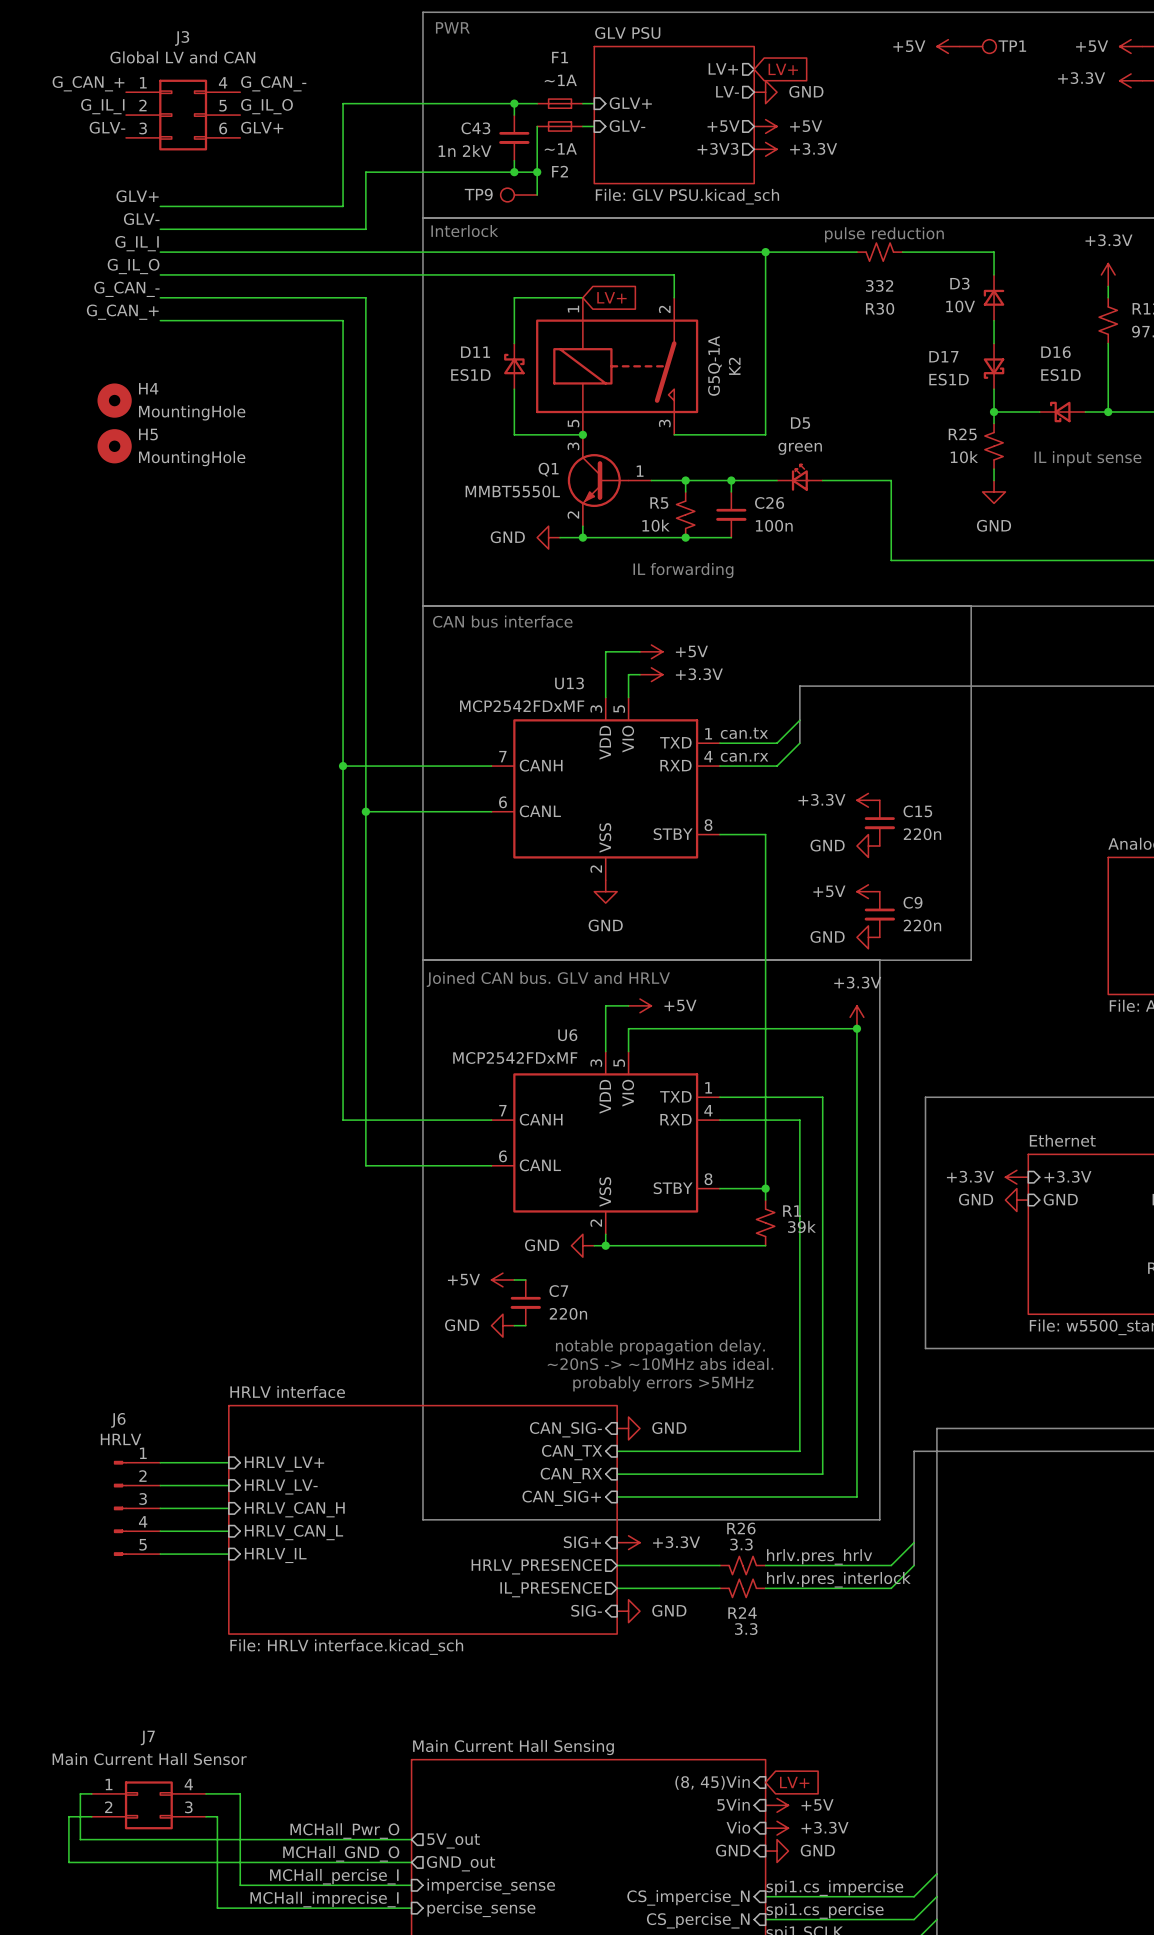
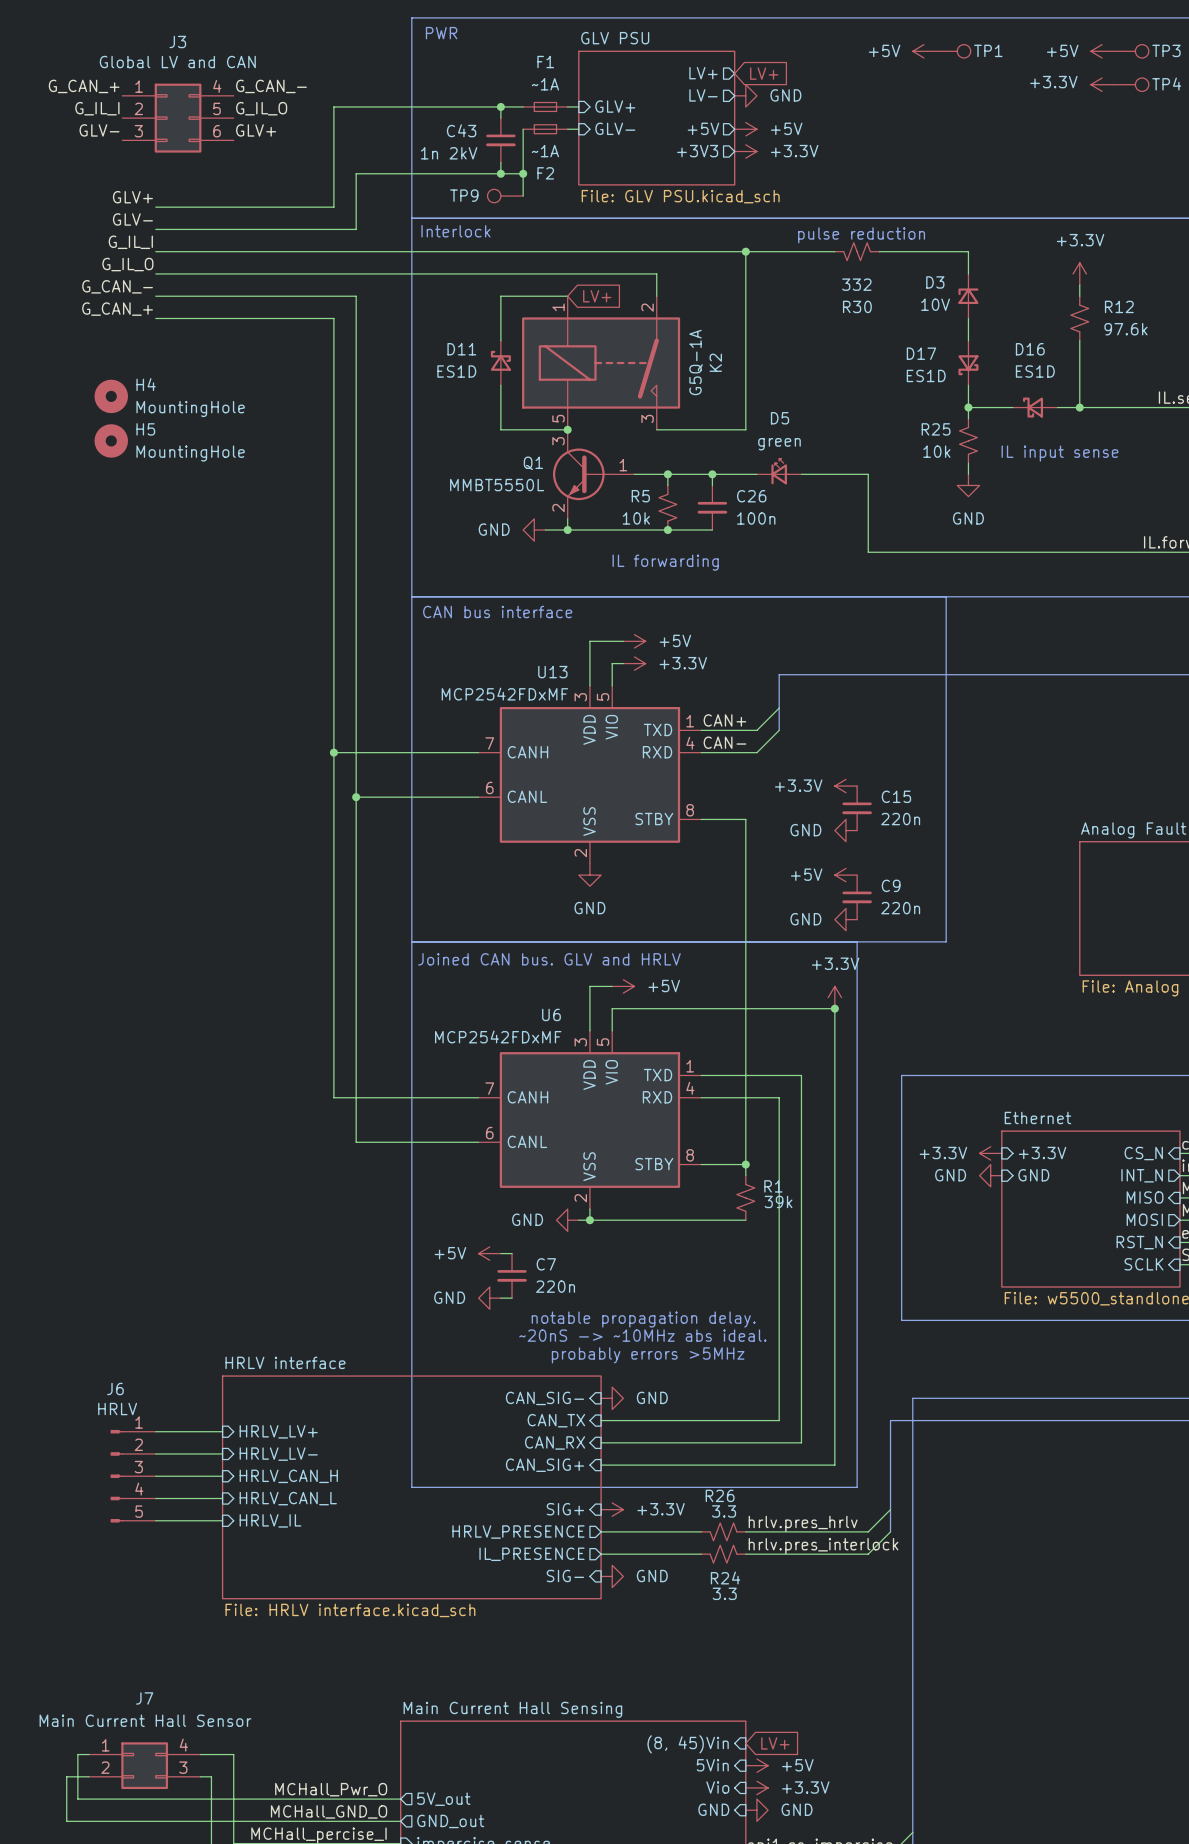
label: can.tx (744, 733) -> CAN+ (724, 720)
label: can.rx (744, 757) -> CAN- (724, 742)

